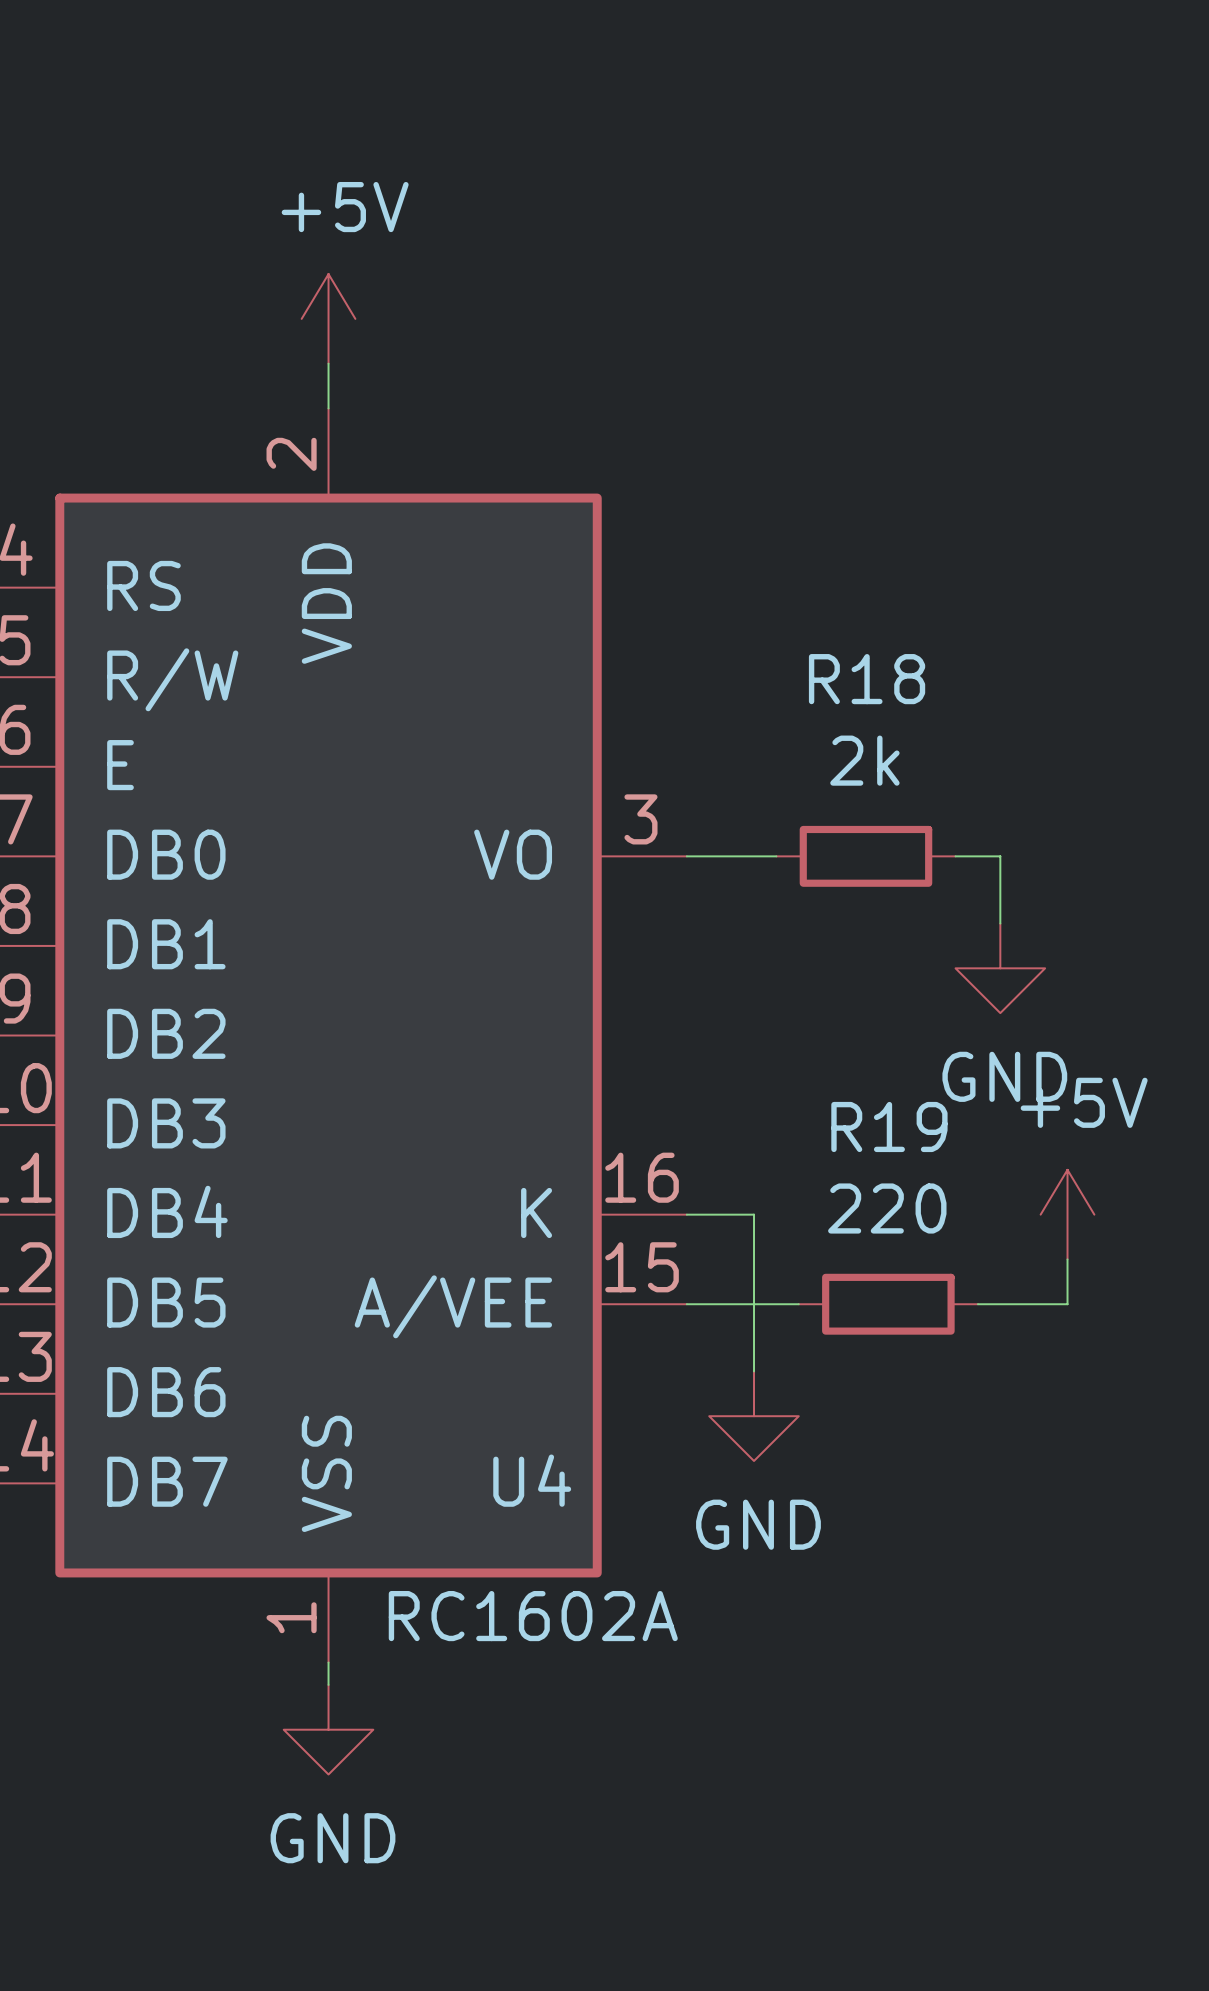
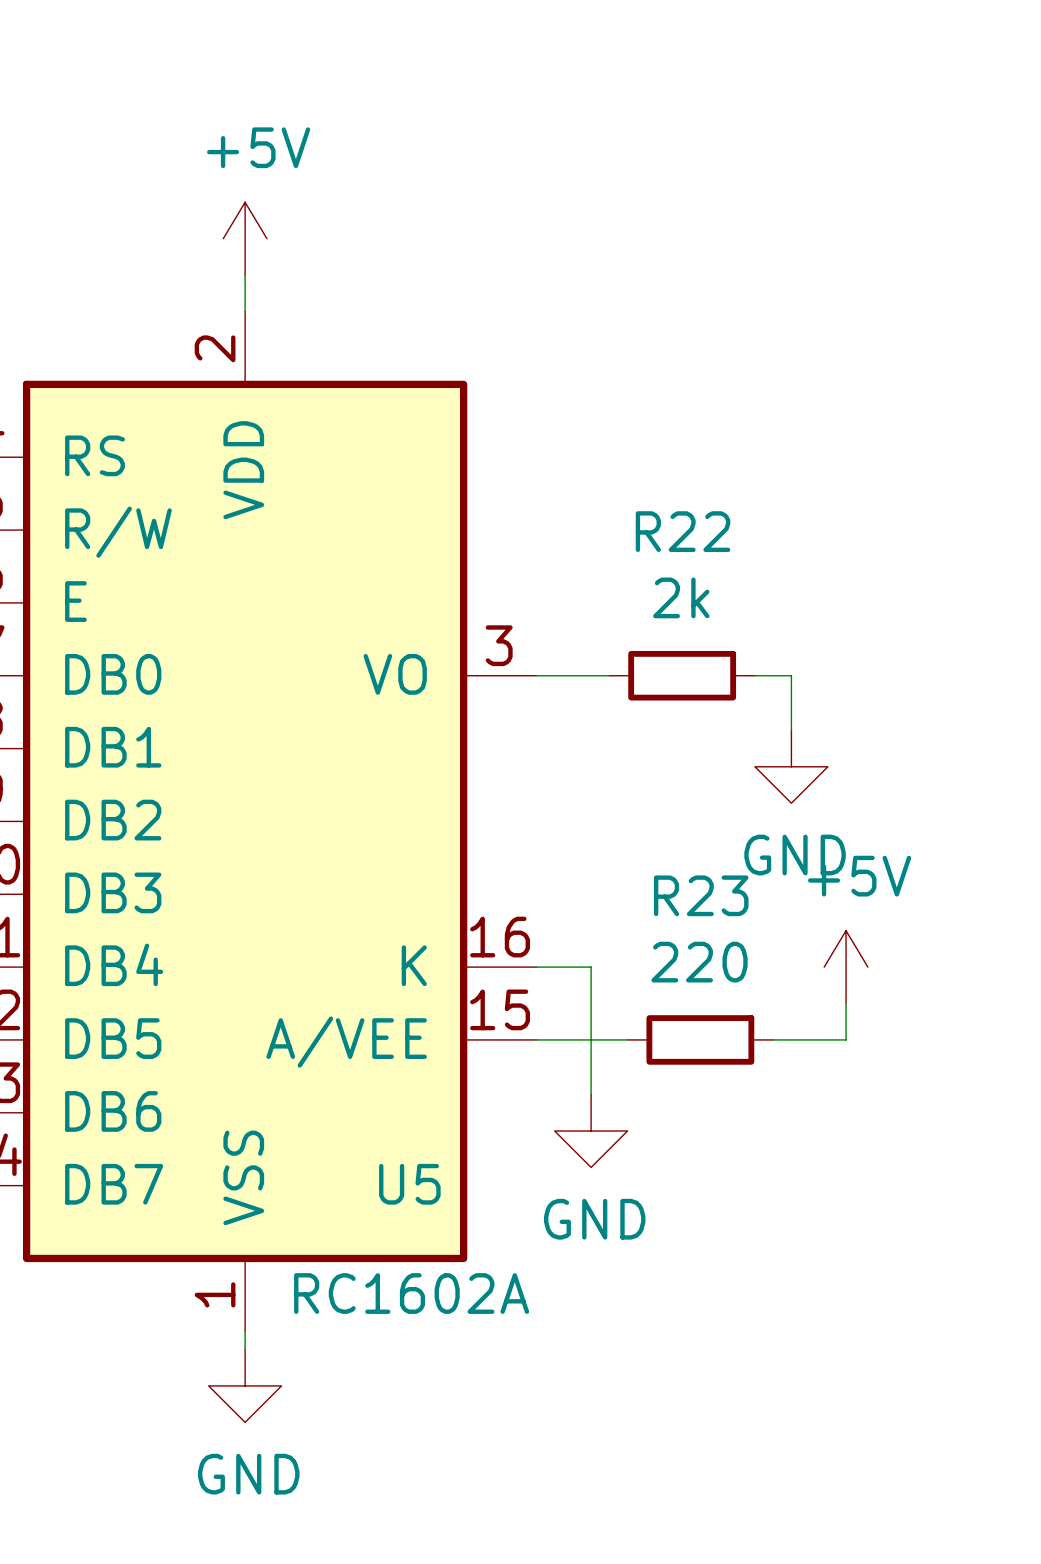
R18 name: R18 (867, 679) -> R22 (683, 531)
R19 name: R19 (889, 1126) -> R23 (701, 895)
U4 name: U4 (532, 1480) -> U5 (409, 1184)

